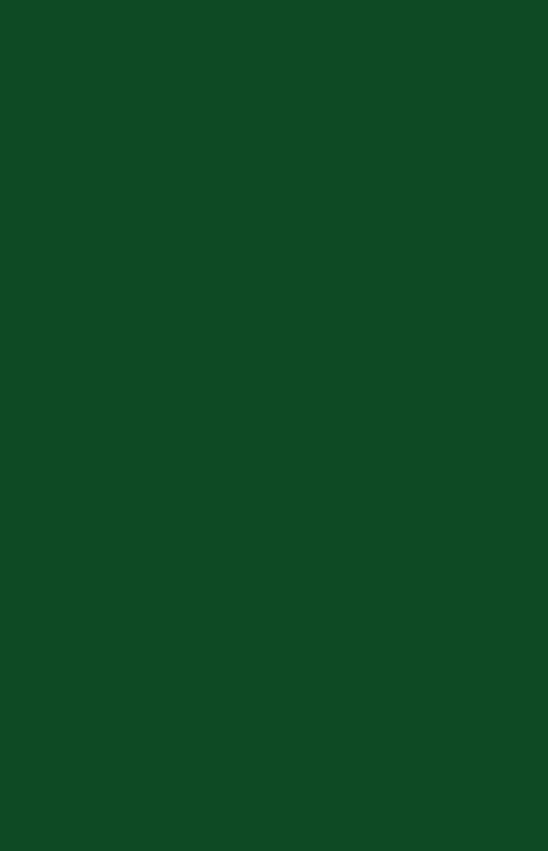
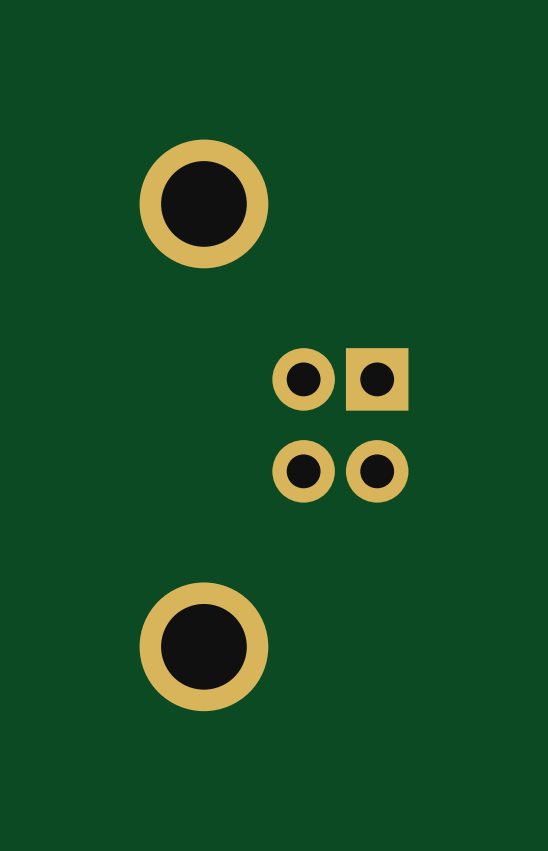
part: none -> (274, 425)

